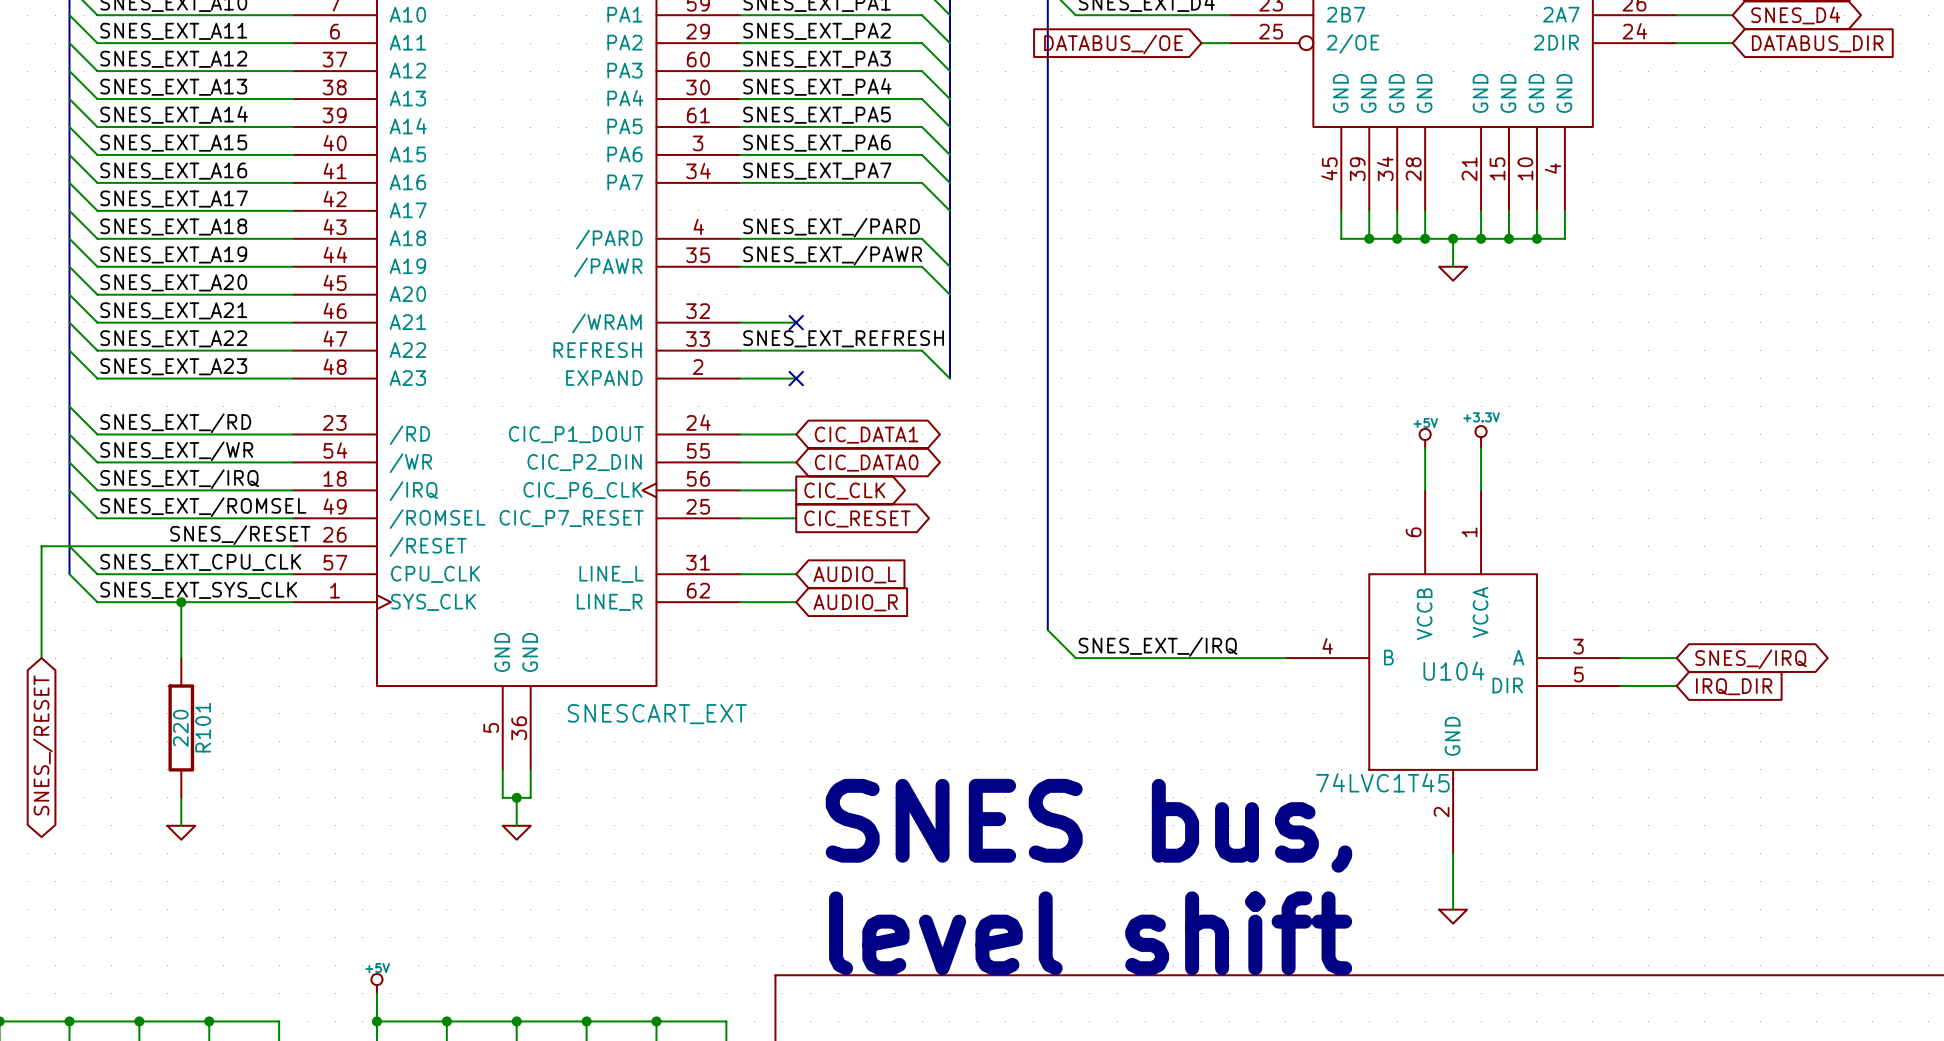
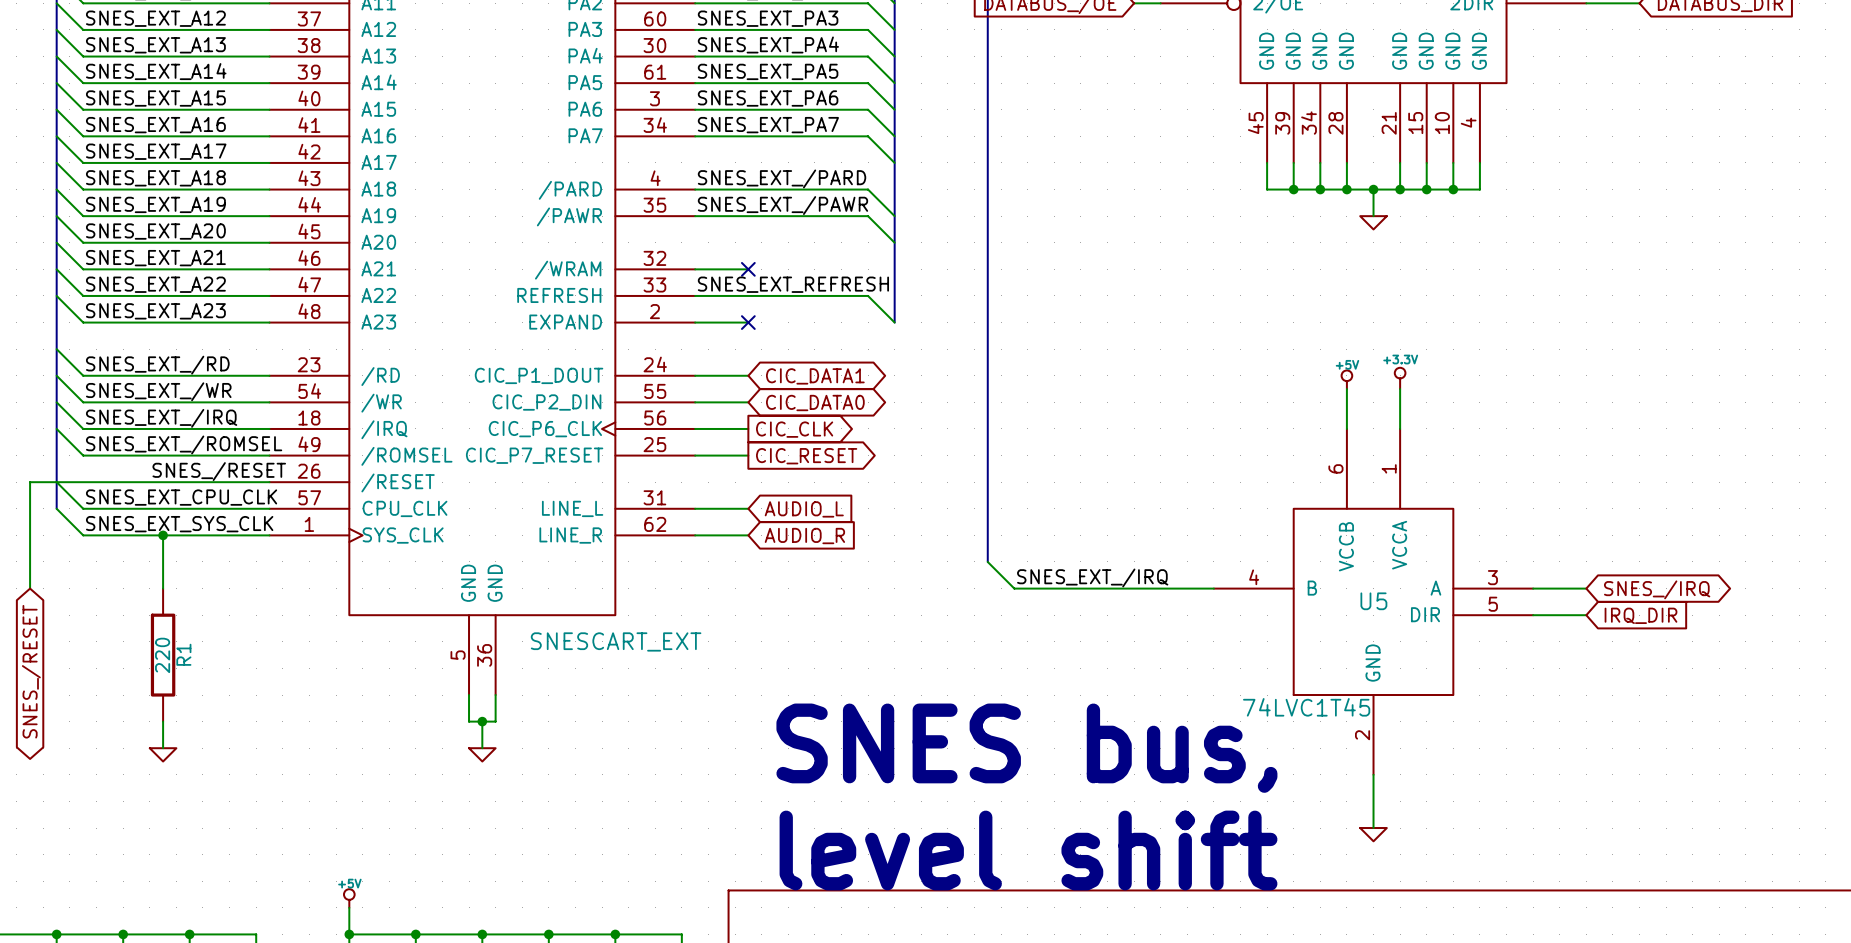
U104 name: U104 (1453, 671) -> U5 (1373, 601)
R101 name: R101 (203, 727) -> R1 (183, 654)

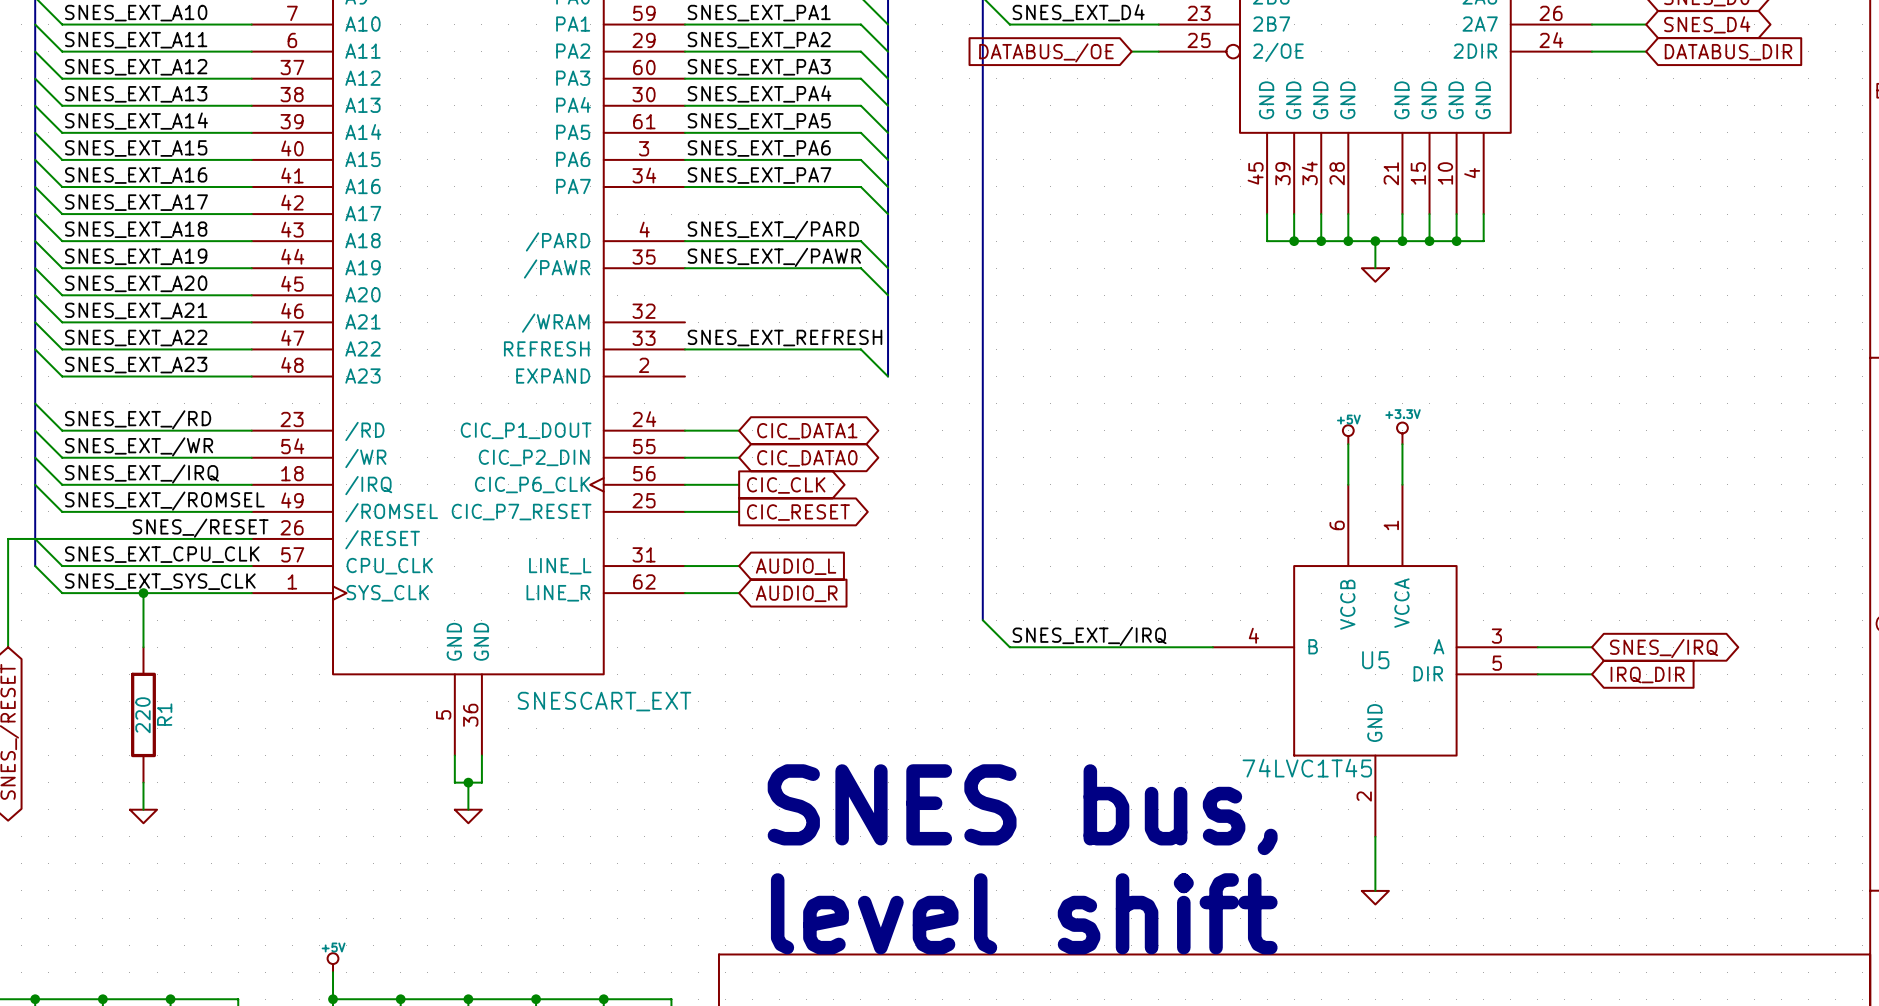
wire: (695, 269) (748, 269) -> none
no-connect mark: (748, 269) -> none
wire: (695, 322) (748, 322) -> none
no-connect mark: (748, 322) -> none

